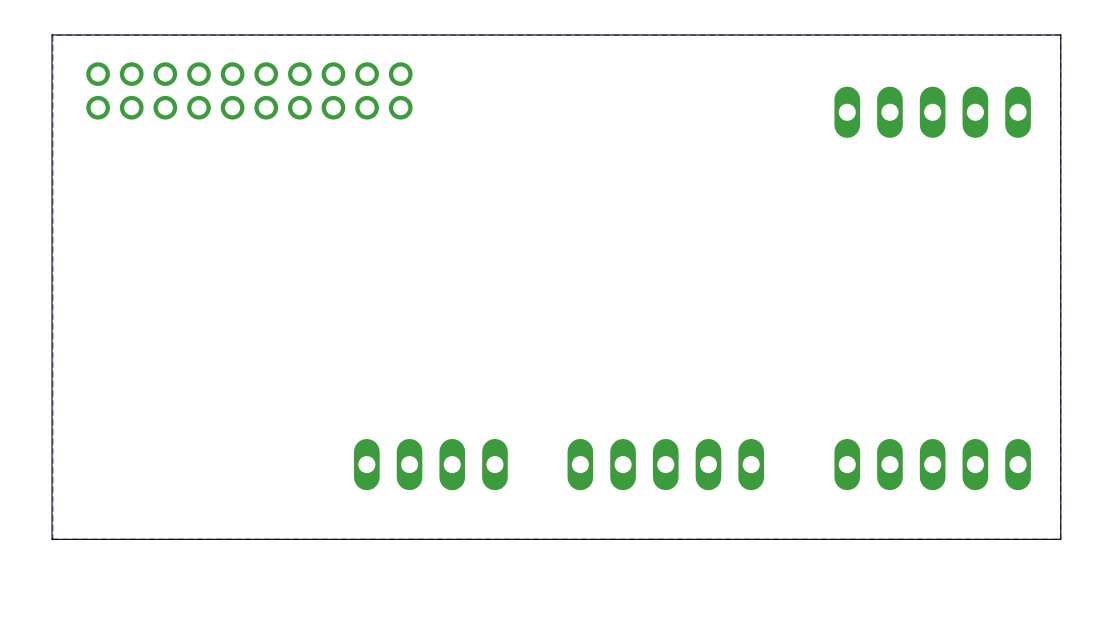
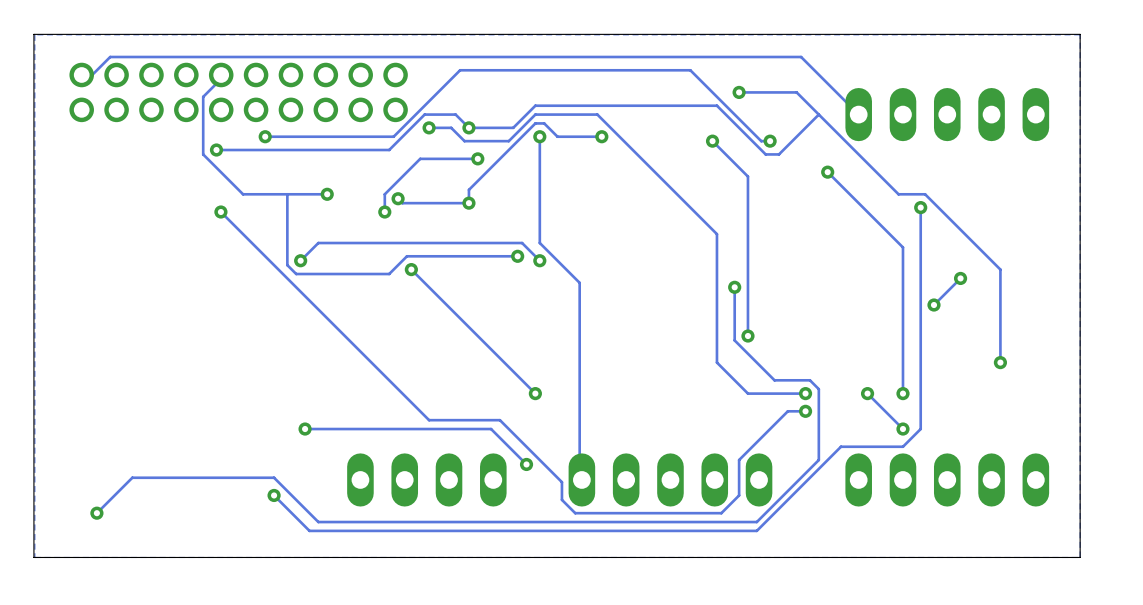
track: none -> (81, 74) (92, 74) (110, 57) (801, 57) (858, 114)
track: none -> (221, 74) (220, 79) (203, 96) (203, 154) (243, 194) (327, 194)
track: none -> (739, 92) (796, 92) (898, 194) (925, 194) (1000, 269) (1000, 362)
via: none -> (739, 92)
track: none -> (818, 114) (778, 154) (765, 154) (716, 105) (535, 105) (513, 127) (468, 127) (455, 114) (424, 114) (389, 150) (216, 150)
track: none -> (429, 127) (451, 127) (464, 141) (508, 141) (535, 114) (597, 114) (716, 234) (716, 362) (747, 393) (805, 393)
via: none -> (429, 127)
via: none -> (468, 127)
track: none -> (265, 136) (393, 136) (460, 70) (690, 70) (761, 141) (770, 141)
via: none -> (265, 136)
track: none -> (539, 136) (539, 243) (579, 282) (579, 477) (581, 479)
via: none -> (539, 136)
track: none -> (601, 136) (557, 136) (544, 123) (535, 123) (468, 189) (468, 203) (402, 203) (398, 198)
via: none -> (601, 136)
track: none -> (712, 141) (747, 176) (747, 336)
via: none -> (712, 141)
via: none -> (770, 141)
via: none -> (216, 150)
track: none -> (477, 158) (420, 158) (384, 194) (384, 212)
via: none -> (477, 158)
track: none -> (827, 172) (902, 247) (902, 393)
via: none -> (827, 172)
track: none -> (287, 194) (287, 265) (296, 274) (389, 274) (406, 256) (517, 256)
via: none -> (327, 194)
via: none -> (398, 198)
via: none -> (468, 203)
track: none -> (920, 207) (920, 429) (902, 446) (840, 446) (756, 530) (309, 530) (274, 495)
via: none -> (920, 207)
track: none -> (220, 212) (429, 420) (499, 420) (561, 482) (561, 499) (575, 513) (721, 513) (739, 495) (739, 460) (787, 411) (805, 411)
via: none -> (220, 212)
via: none -> (384, 212)
via: none -> (517, 256)
via: none -> (300, 260)
track: none -> (539, 260) (522, 243) (318, 243) (300, 260)
via: none -> (539, 260)
track: none -> (411, 269) (535, 393)
via: none -> (411, 269)
track: none -> (960, 278) (933, 305)
via: none -> (960, 278)
track: none -> (734, 287) (734, 340) (774, 380) (809, 380) (818, 389) (818, 460) (756, 522) (318, 522) (274, 477) (132, 477) (96, 513)
via: none -> (734, 287)
via: none -> (933, 305)
via: none -> (747, 336)
via: none -> (1000, 362)
via: none -> (535, 393)
via: none -> (805, 393)
track: none -> (867, 393) (902, 429)
via: none -> (867, 393)
via: none -> (902, 393)
via: none -> (805, 411)
track: none -> (305, 429) (491, 429) (526, 464)
via: none -> (305, 429)
via: none -> (902, 429)
via: none -> (526, 464)
via: none -> (274, 495)
via: none -> (96, 513)

